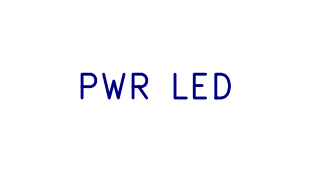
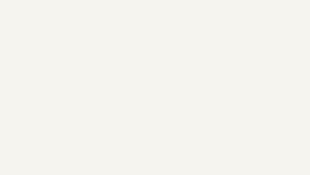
text: PWR LED (155, 86) -> none

